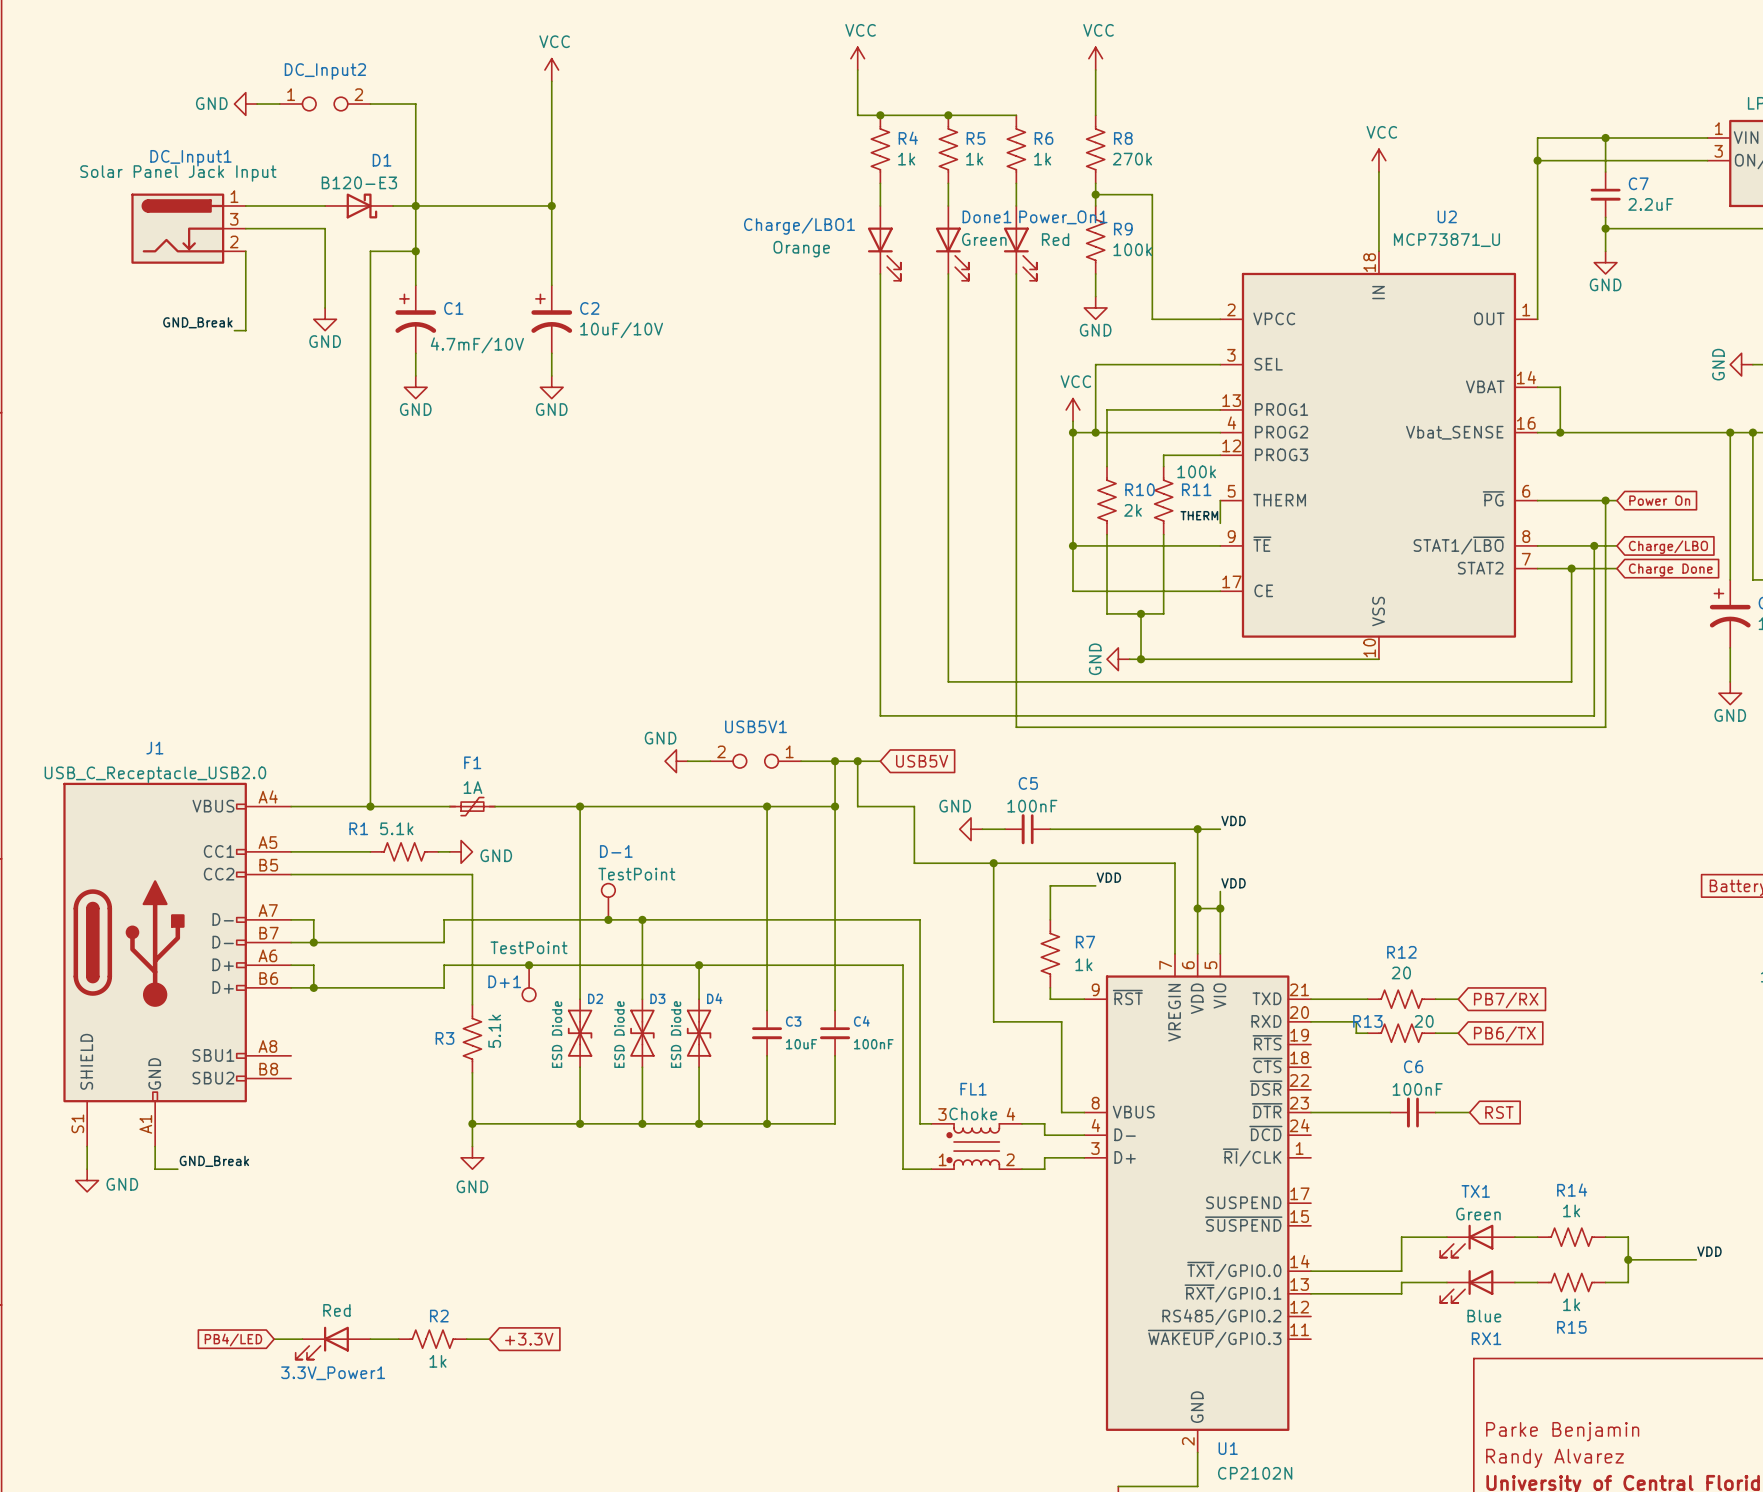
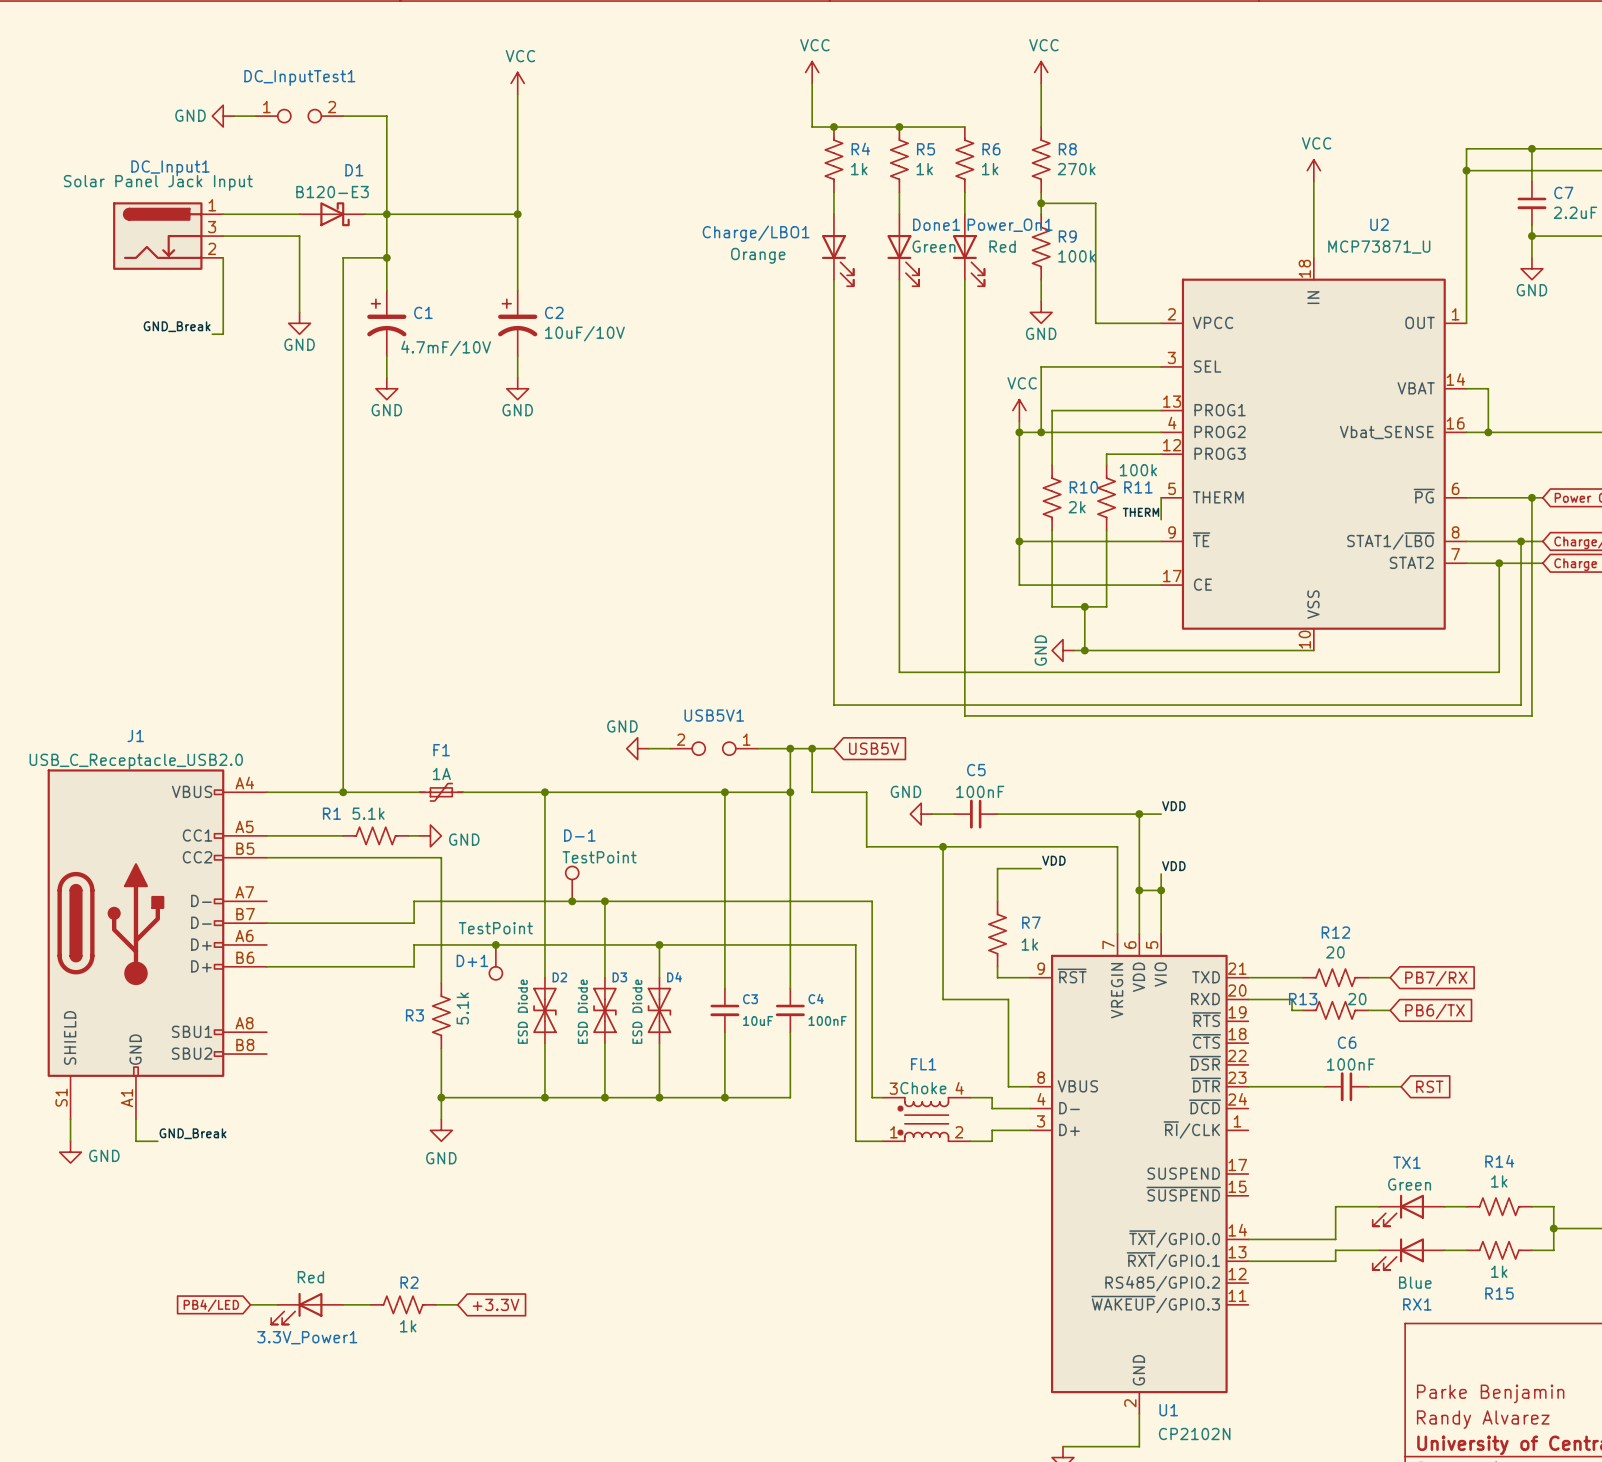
DC_Input2 name: DC_Input2 (325, 71) -> DC_InputTest1 (299, 78)
wire: (291, 919) (313, 919) (313, 942) -> none
junction: (313, 942) -> none
wire: (291, 965) (313, 965) (313, 987) -> none
junction: (313, 987) -> none

